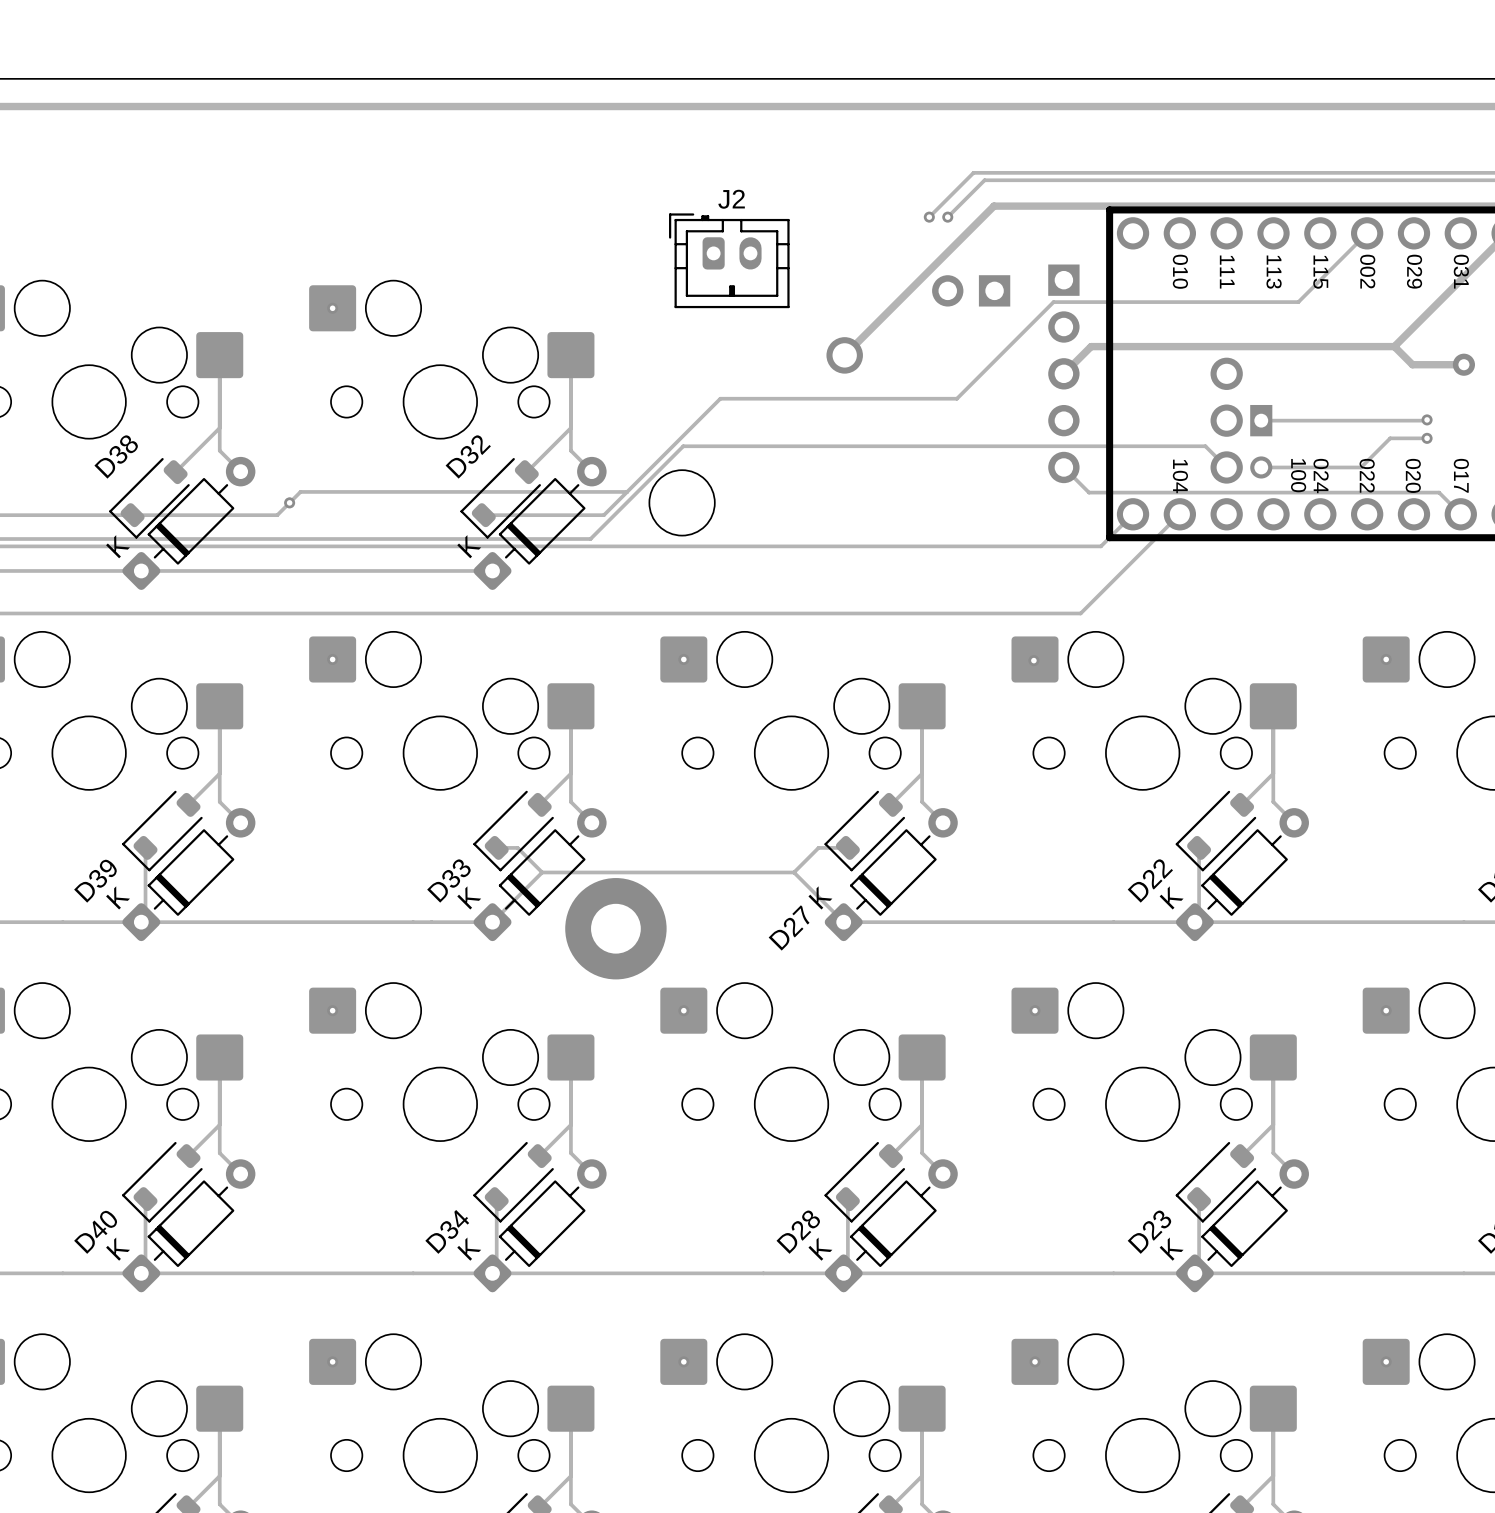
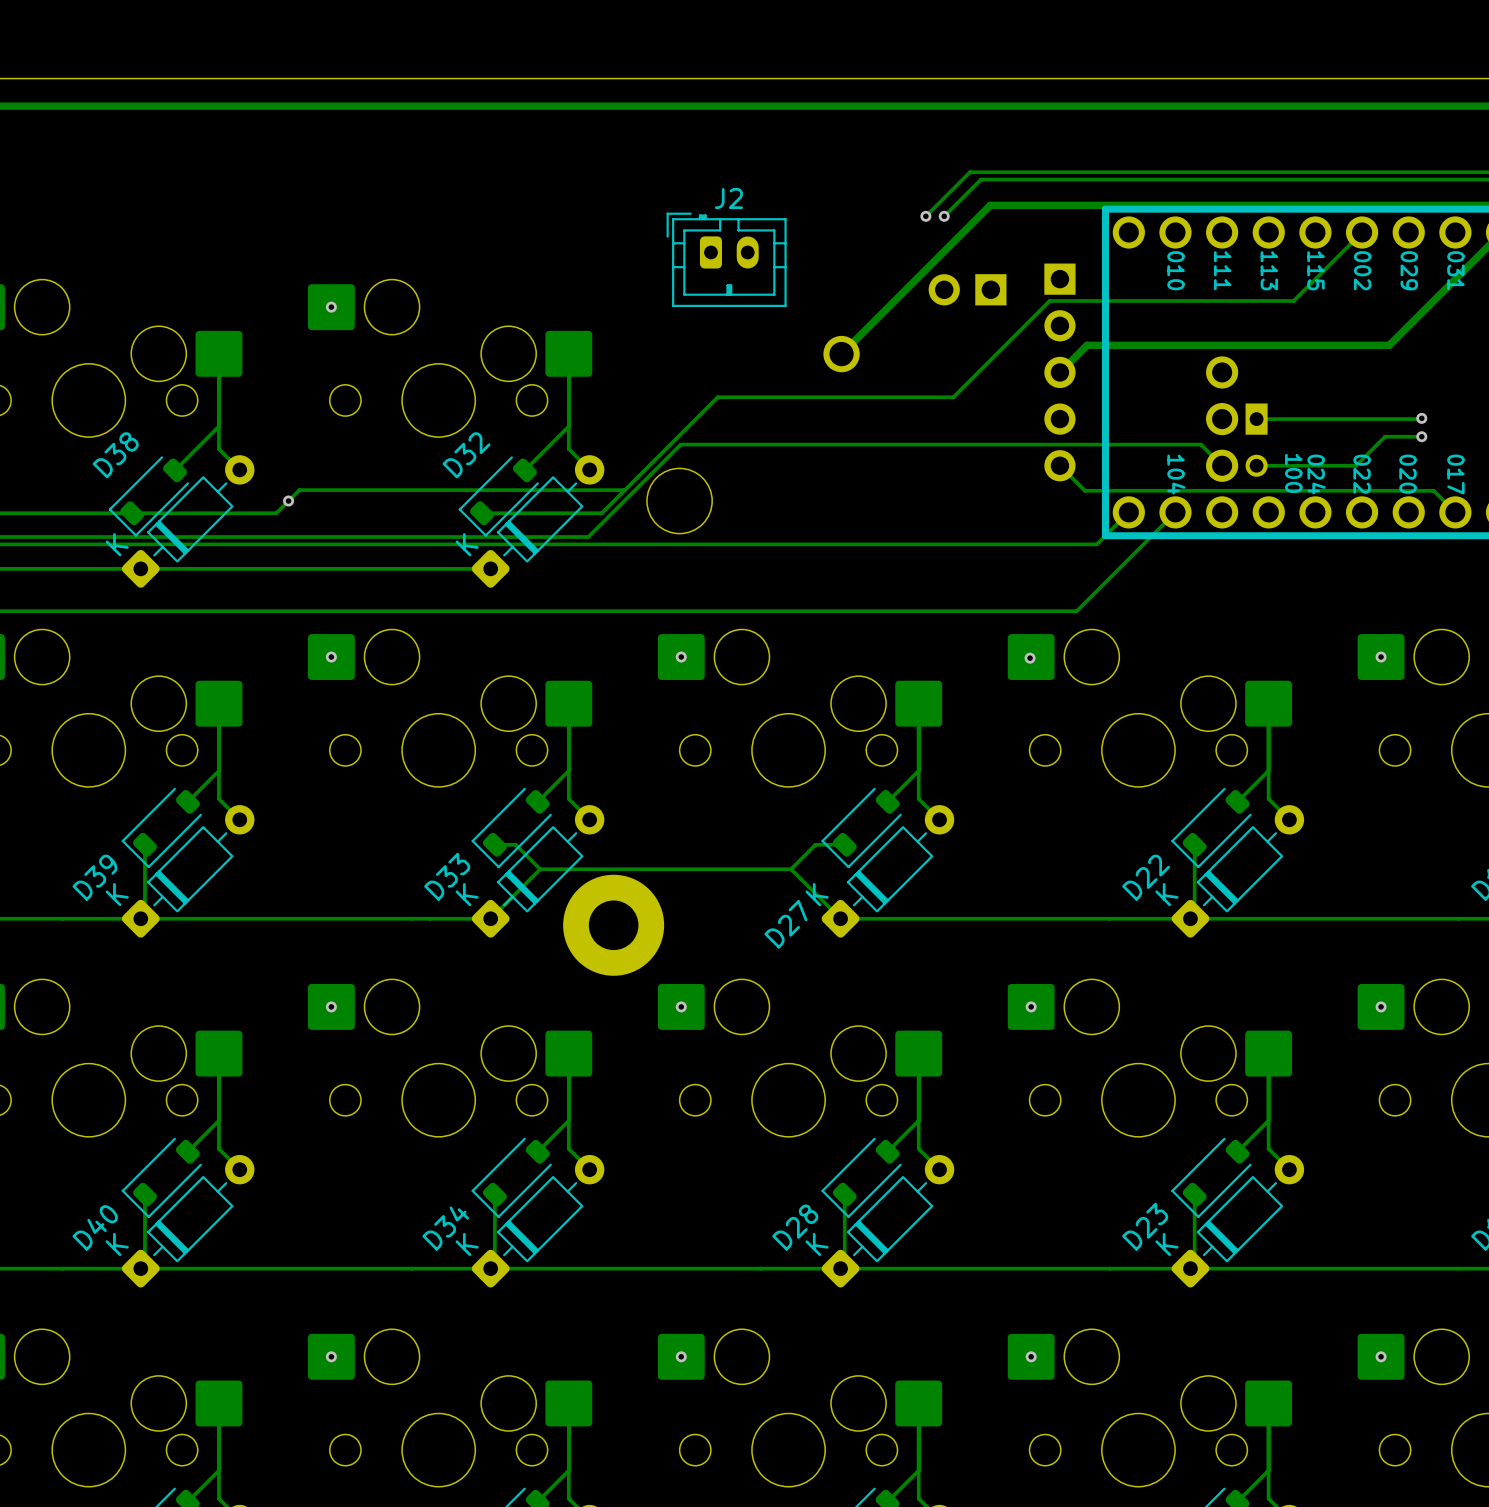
track: (1394, 346) (1412, 364) (1463, 364) -> none
via: (1463, 364) -> none

